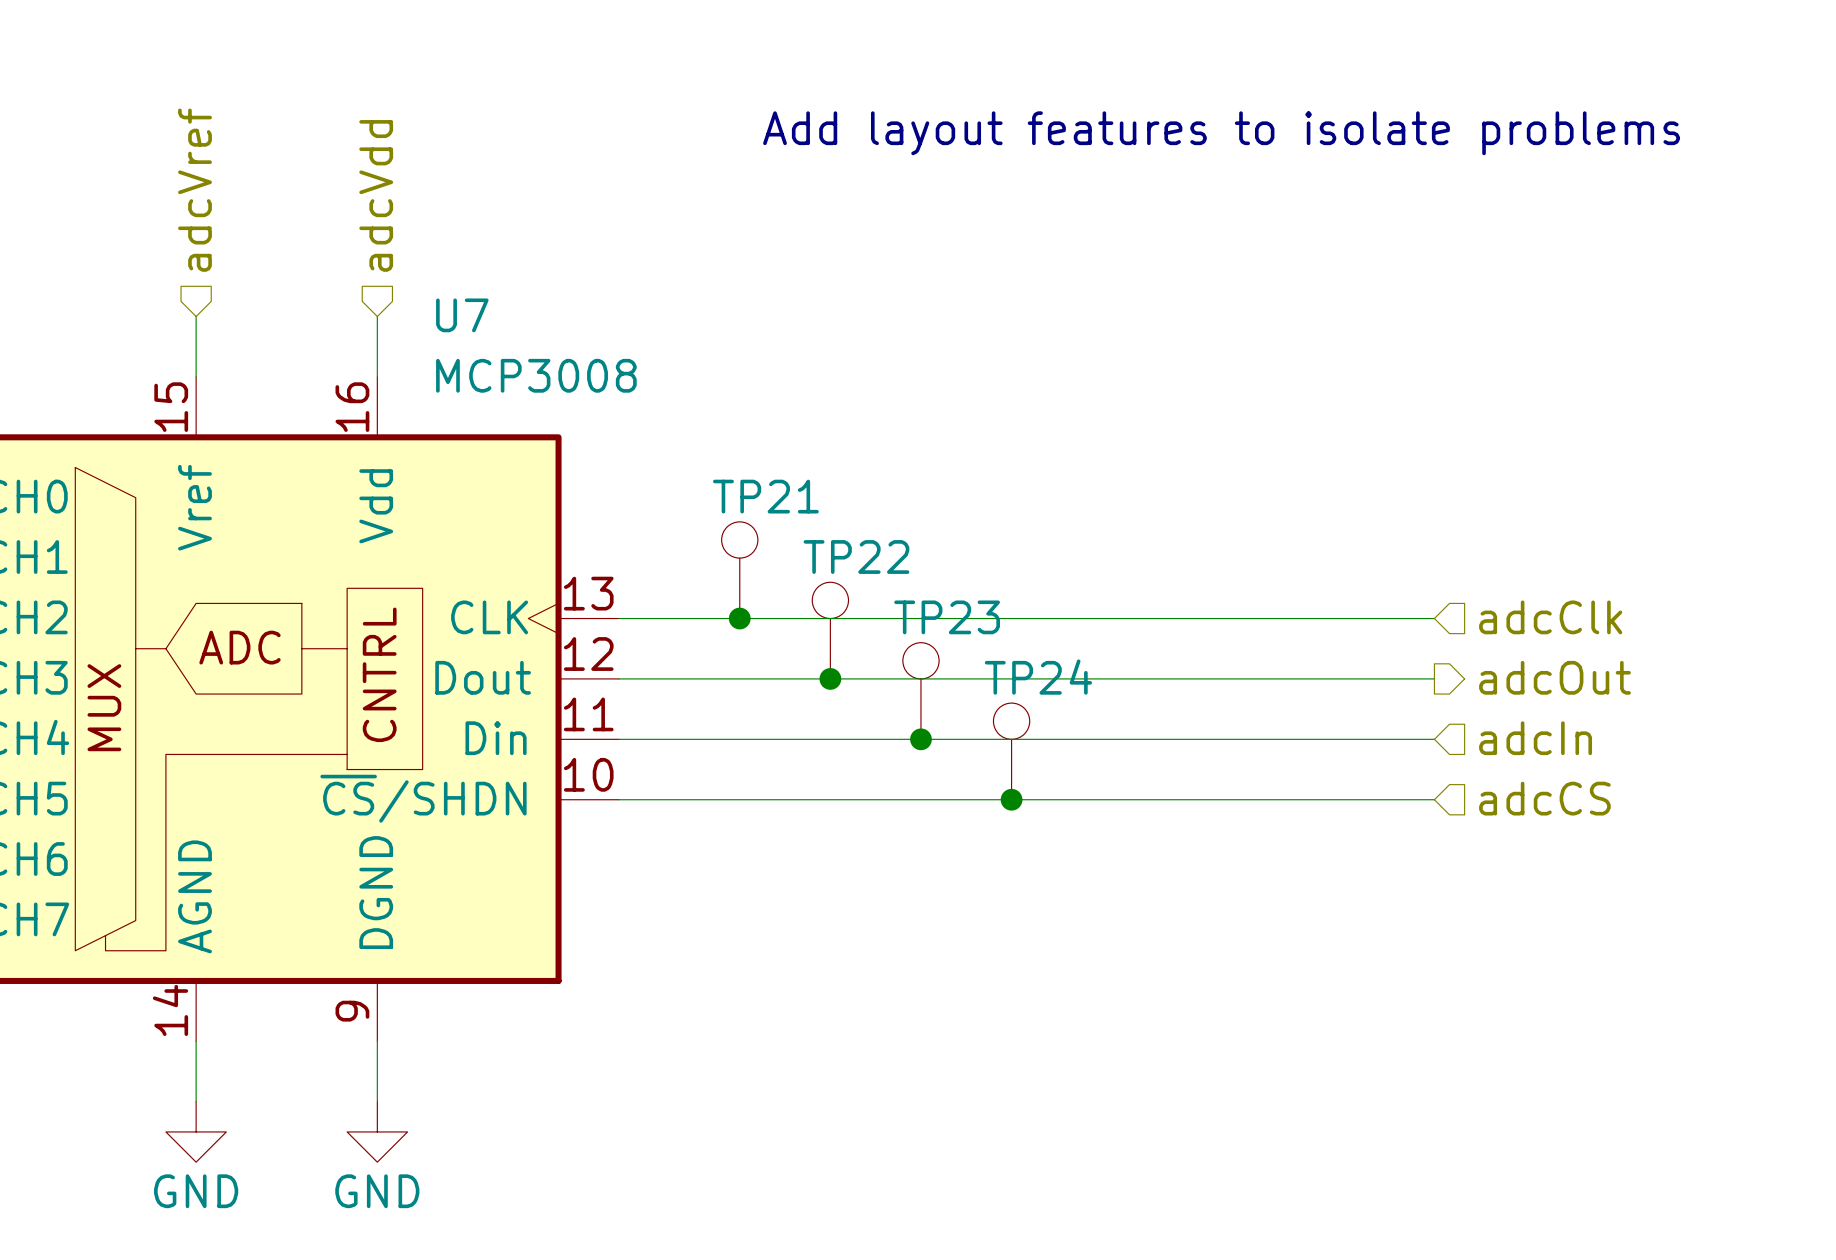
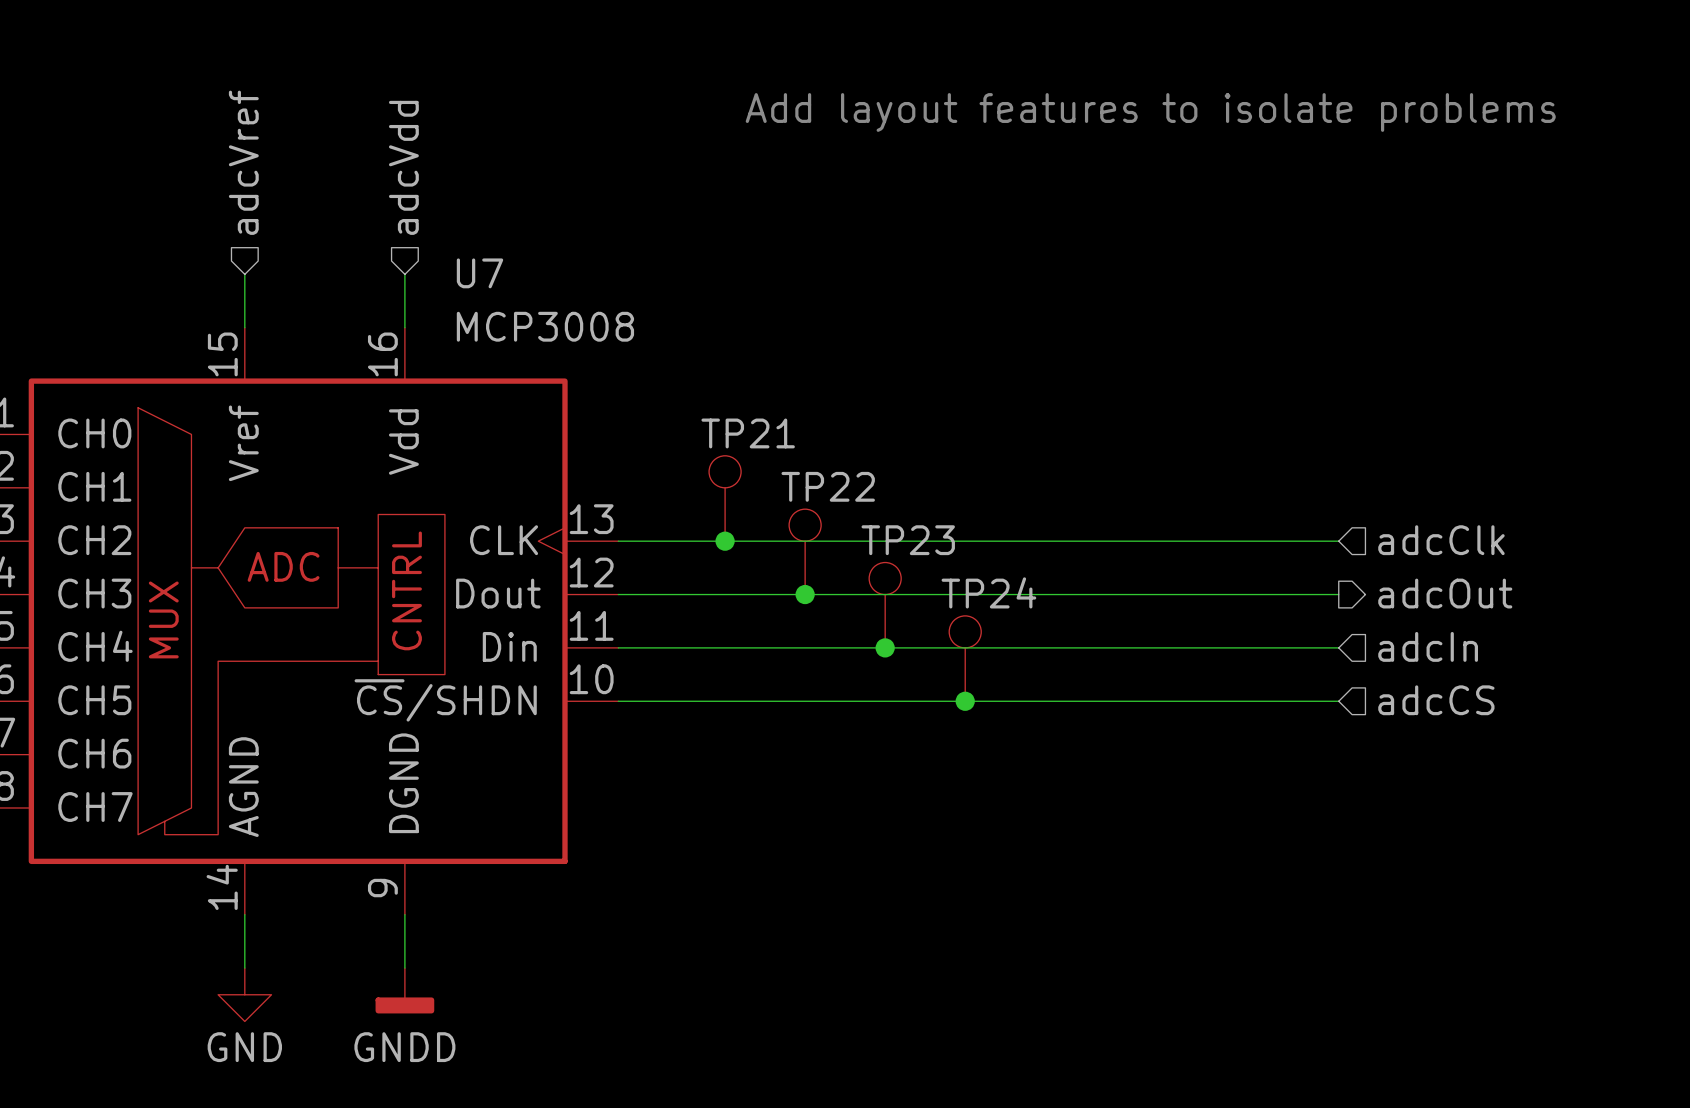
power symbol: GND (377, 1131) -> GNDD (404, 990)

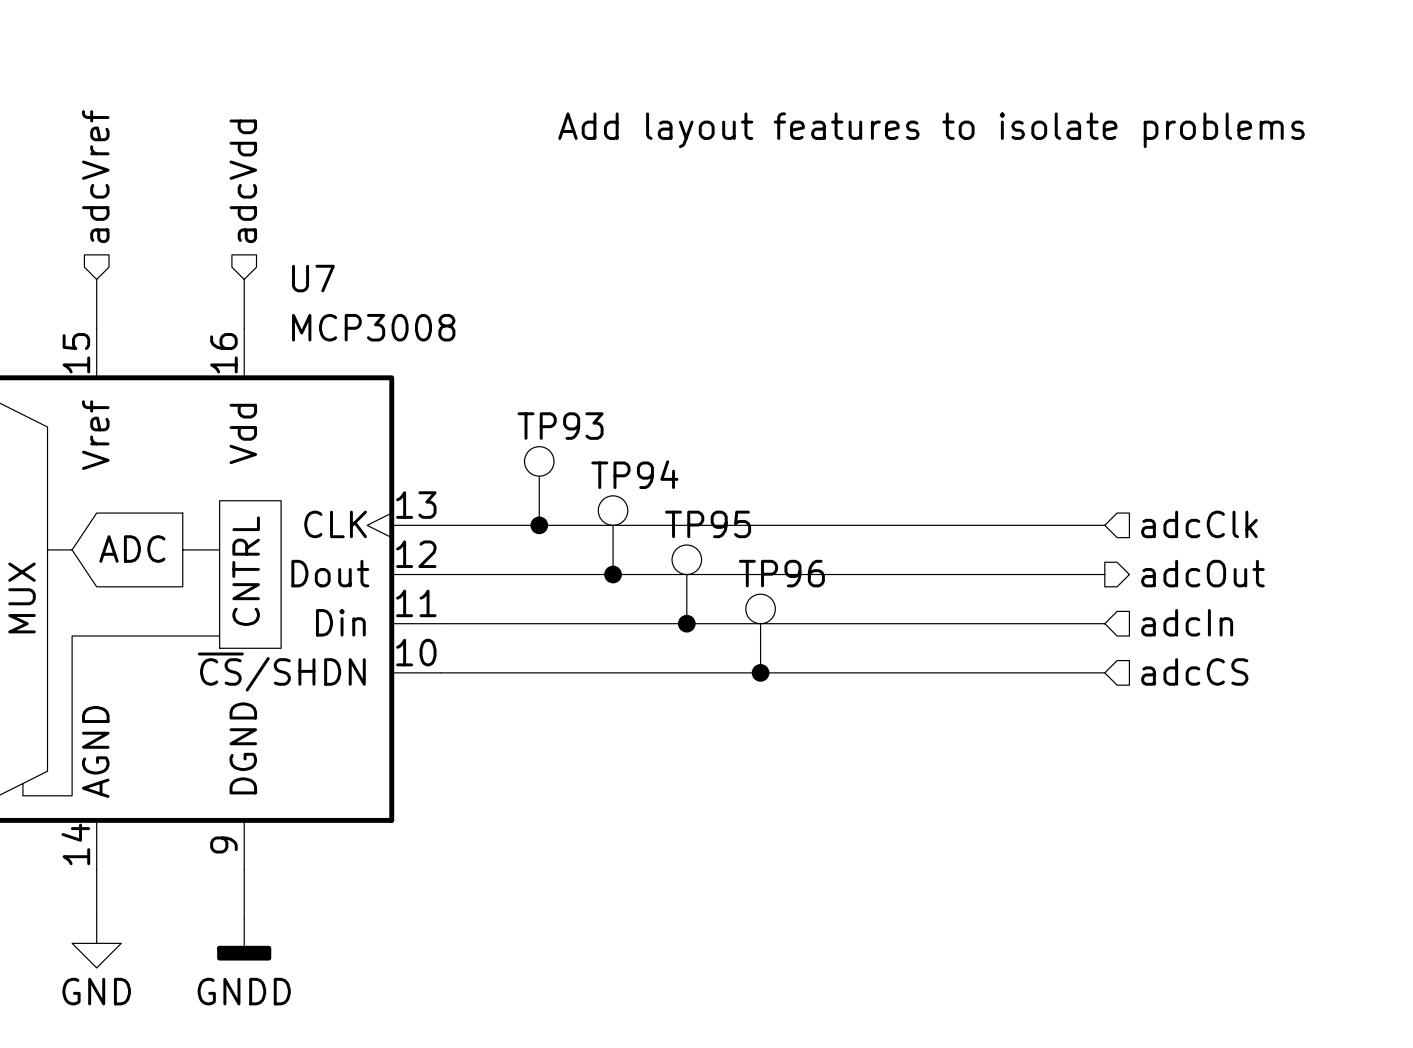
TP21 name: TP21 (748, 433) -> TP93 (560, 426)
TP22 name: TP22 (828, 486) -> TP94 (634, 474)
TP23 name: TP23 (908, 540) -> TP95 (708, 524)
TP24 name: TP24 (988, 592) -> TP96 (781, 573)

